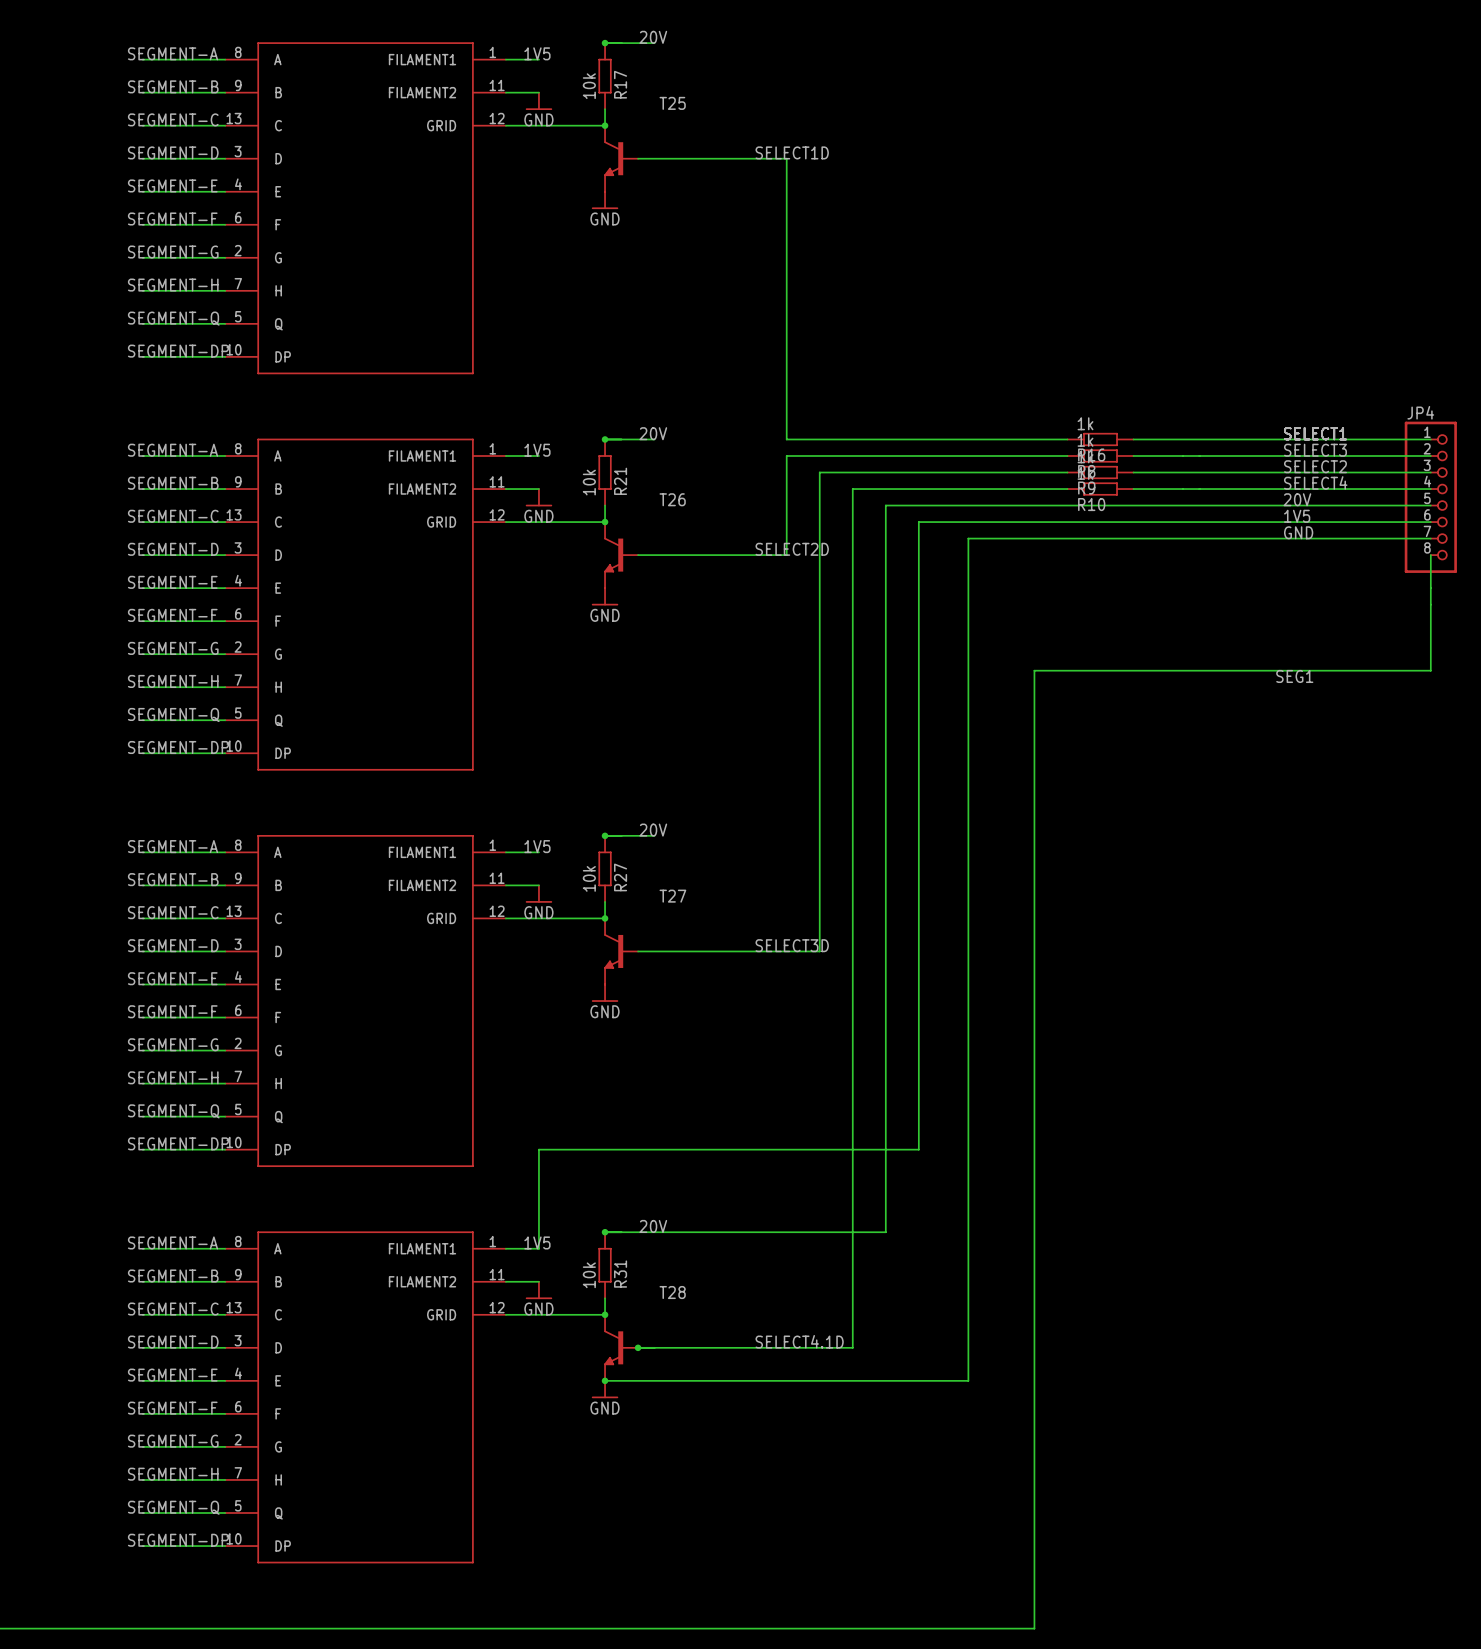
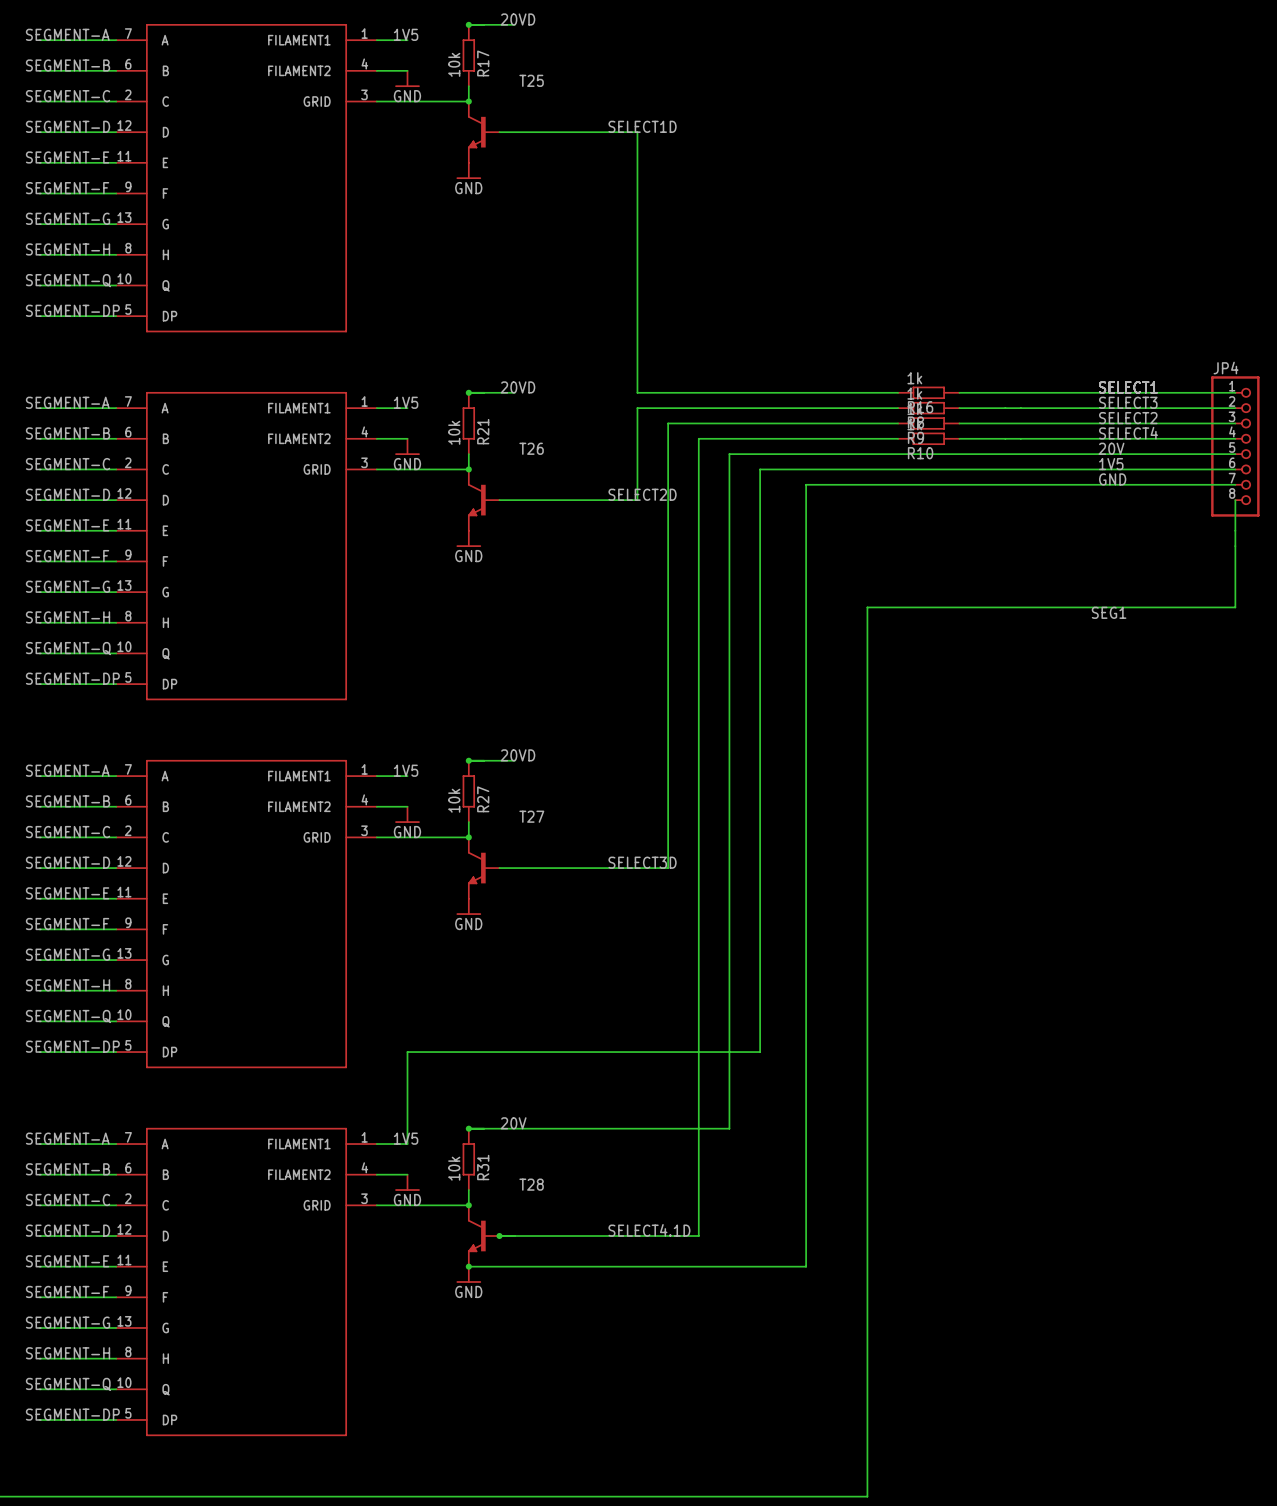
label: 20V (653, 37) -> 20VD (517, 19)
part symbol: [225, 42, 506, 374] -> [116, 24, 377, 332]
label: 20V (653, 433) -> 20VD (517, 387)
part symbol: [225, 438, 506, 771] -> [116, 392, 377, 700]
label: 20V (653, 830) -> 20VD (517, 755)
part symbol: [225, 835, 506, 1167] -> [116, 760, 377, 1068]
part symbol: [225, 1231, 506, 1564] -> [116, 1128, 377, 1436]

